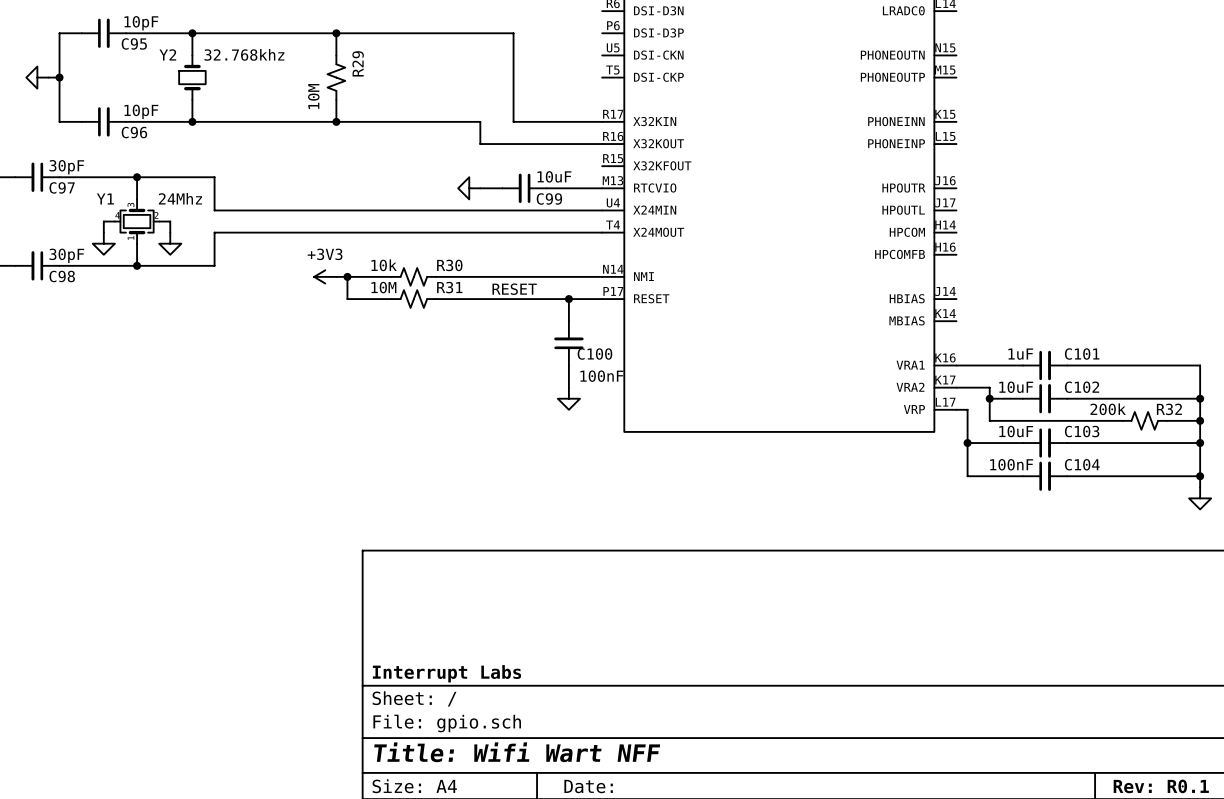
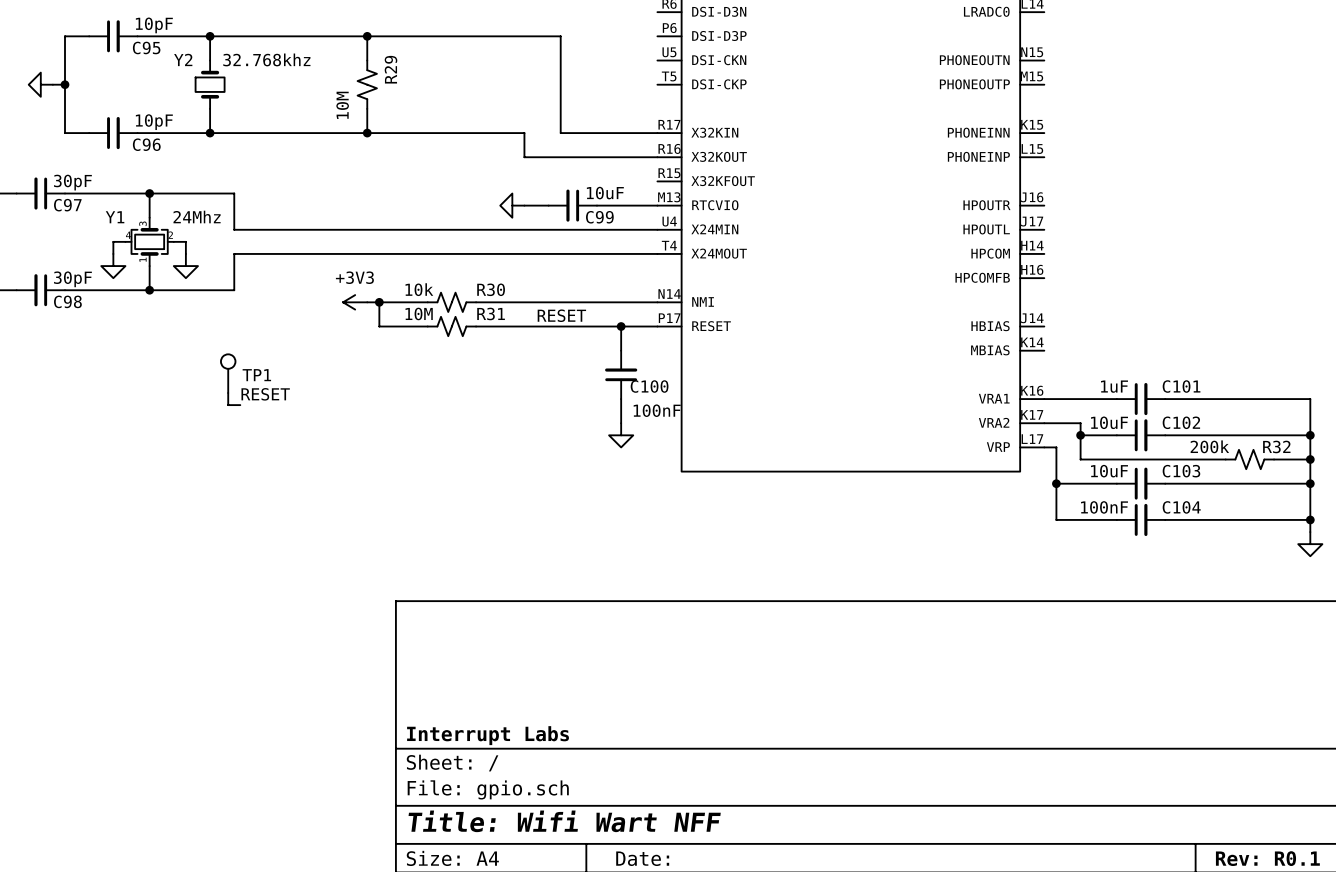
TP1: none -> (228, 373)
wire: none -> (228, 393) (228, 405) (240, 405)
label: none -> RESET (265, 394)

